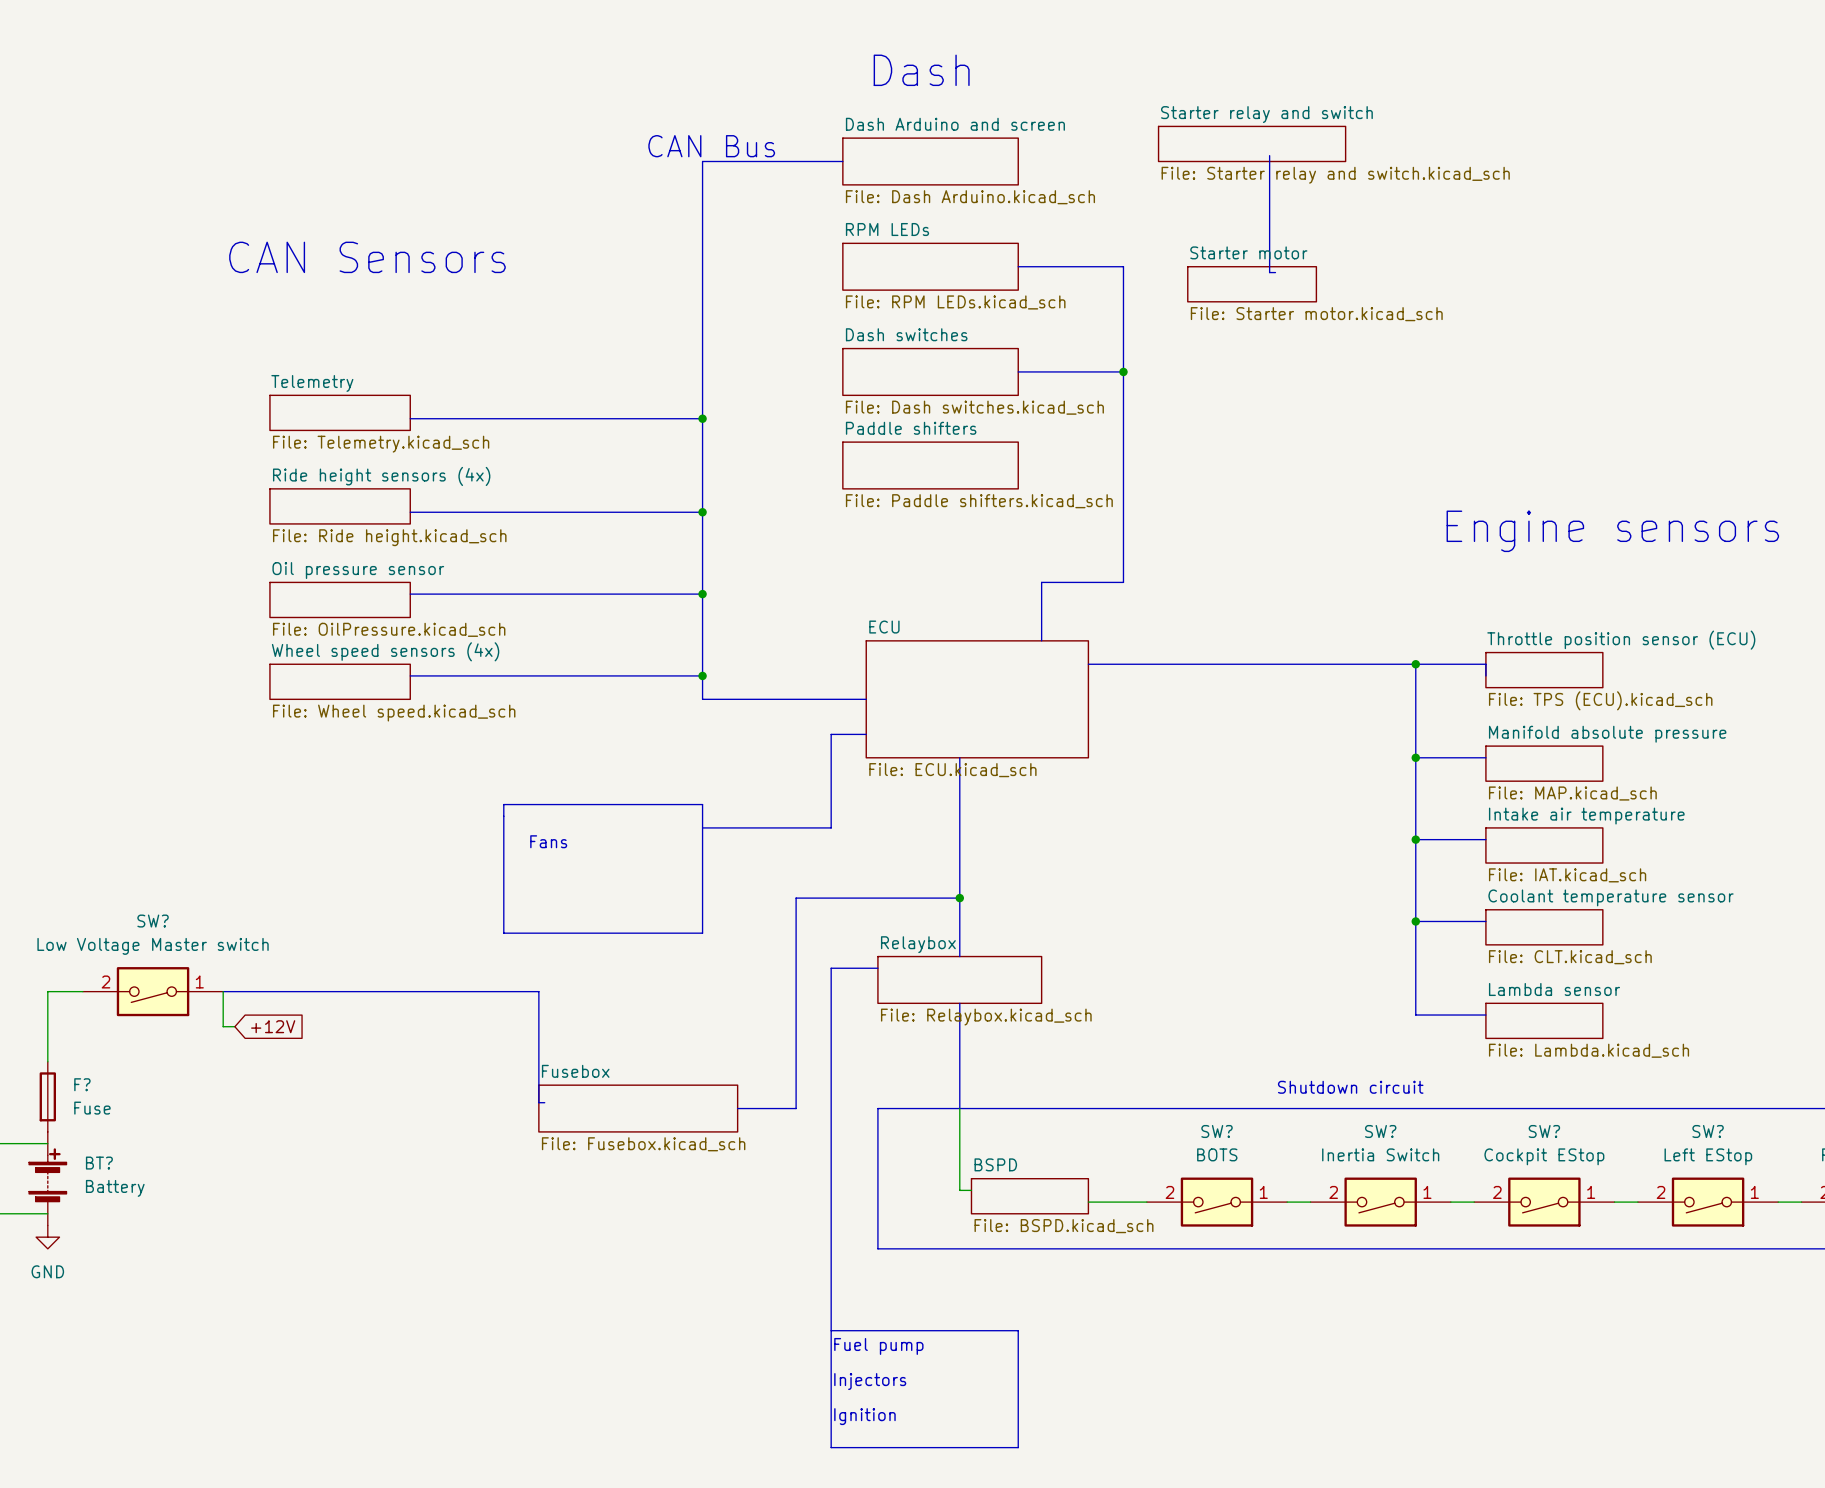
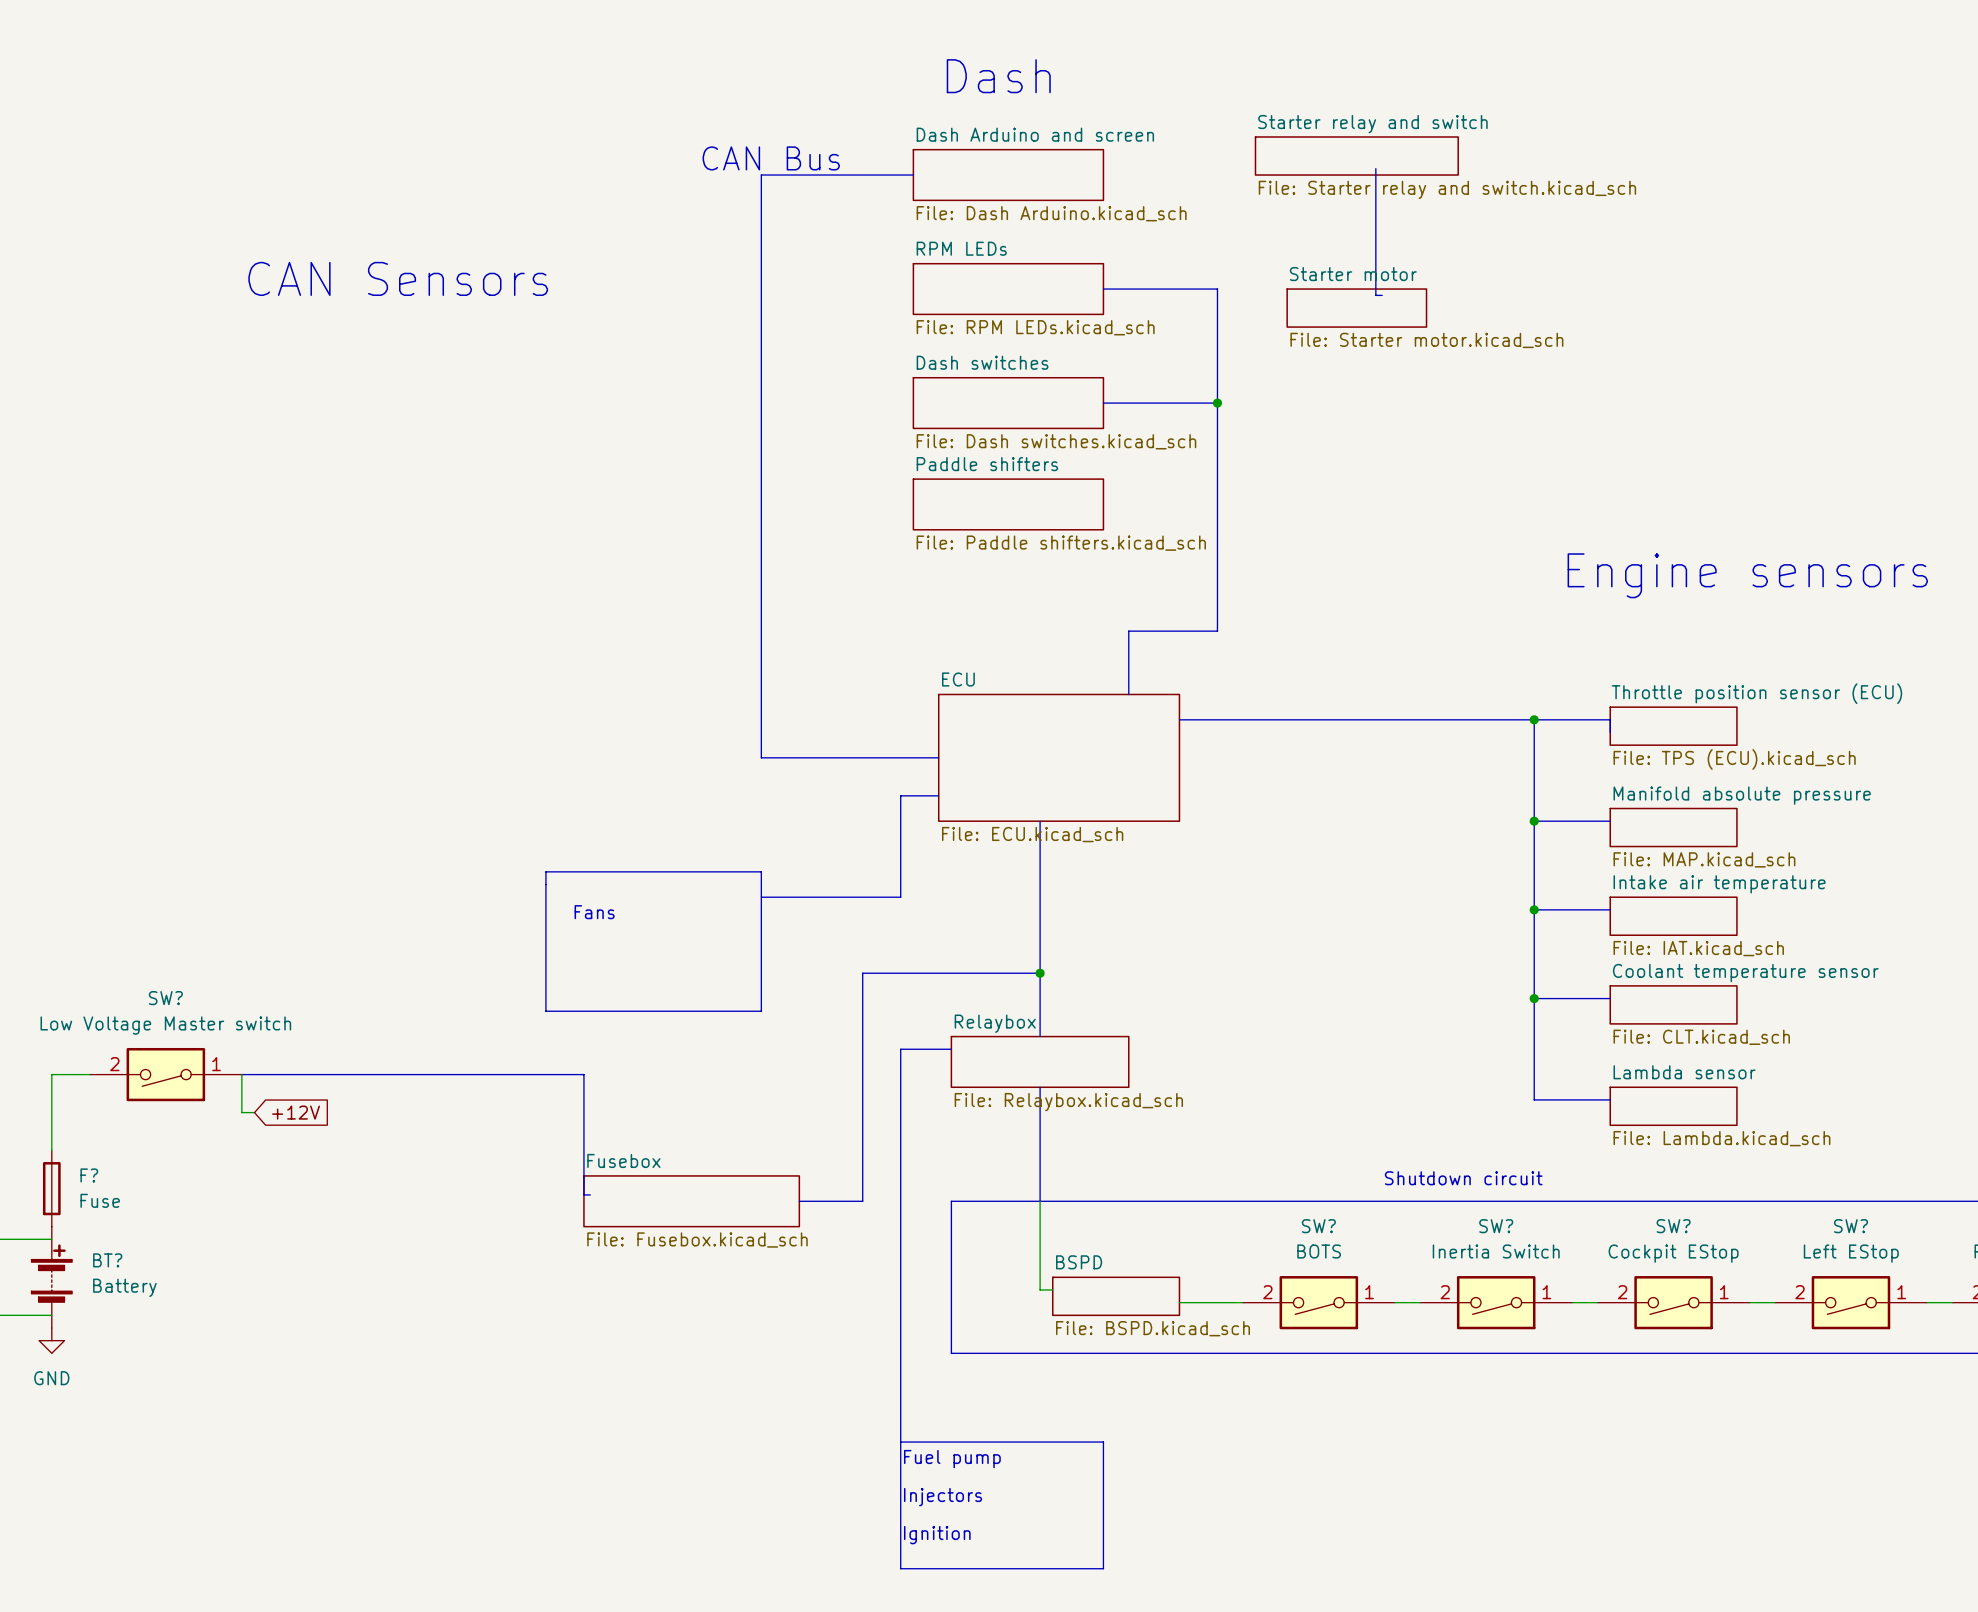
sheet Telemetry: File: Telemetry.kicad_sch (340, 412) -> none
bus: (410, 418) (702, 418) -> none
junction: (702, 418) -> none
sheet Ride height sensors (4x): File: Ride height.kicad_sch (340, 506) -> none
bus: (410, 512) (702, 512) -> none
junction: (702, 512) -> none
bus: (410, 594) (702, 594) -> none
junction: (702, 594) -> none
sheet Oil pressure sensor: File: OilPressure.kicad_sch (340, 599) -> none
bus: (410, 675) (702, 675) -> none
junction: (702, 675) -> none
sheet Wheel speed sensors (4x): File: Wheel speed.kicad_sch (340, 681) -> none

